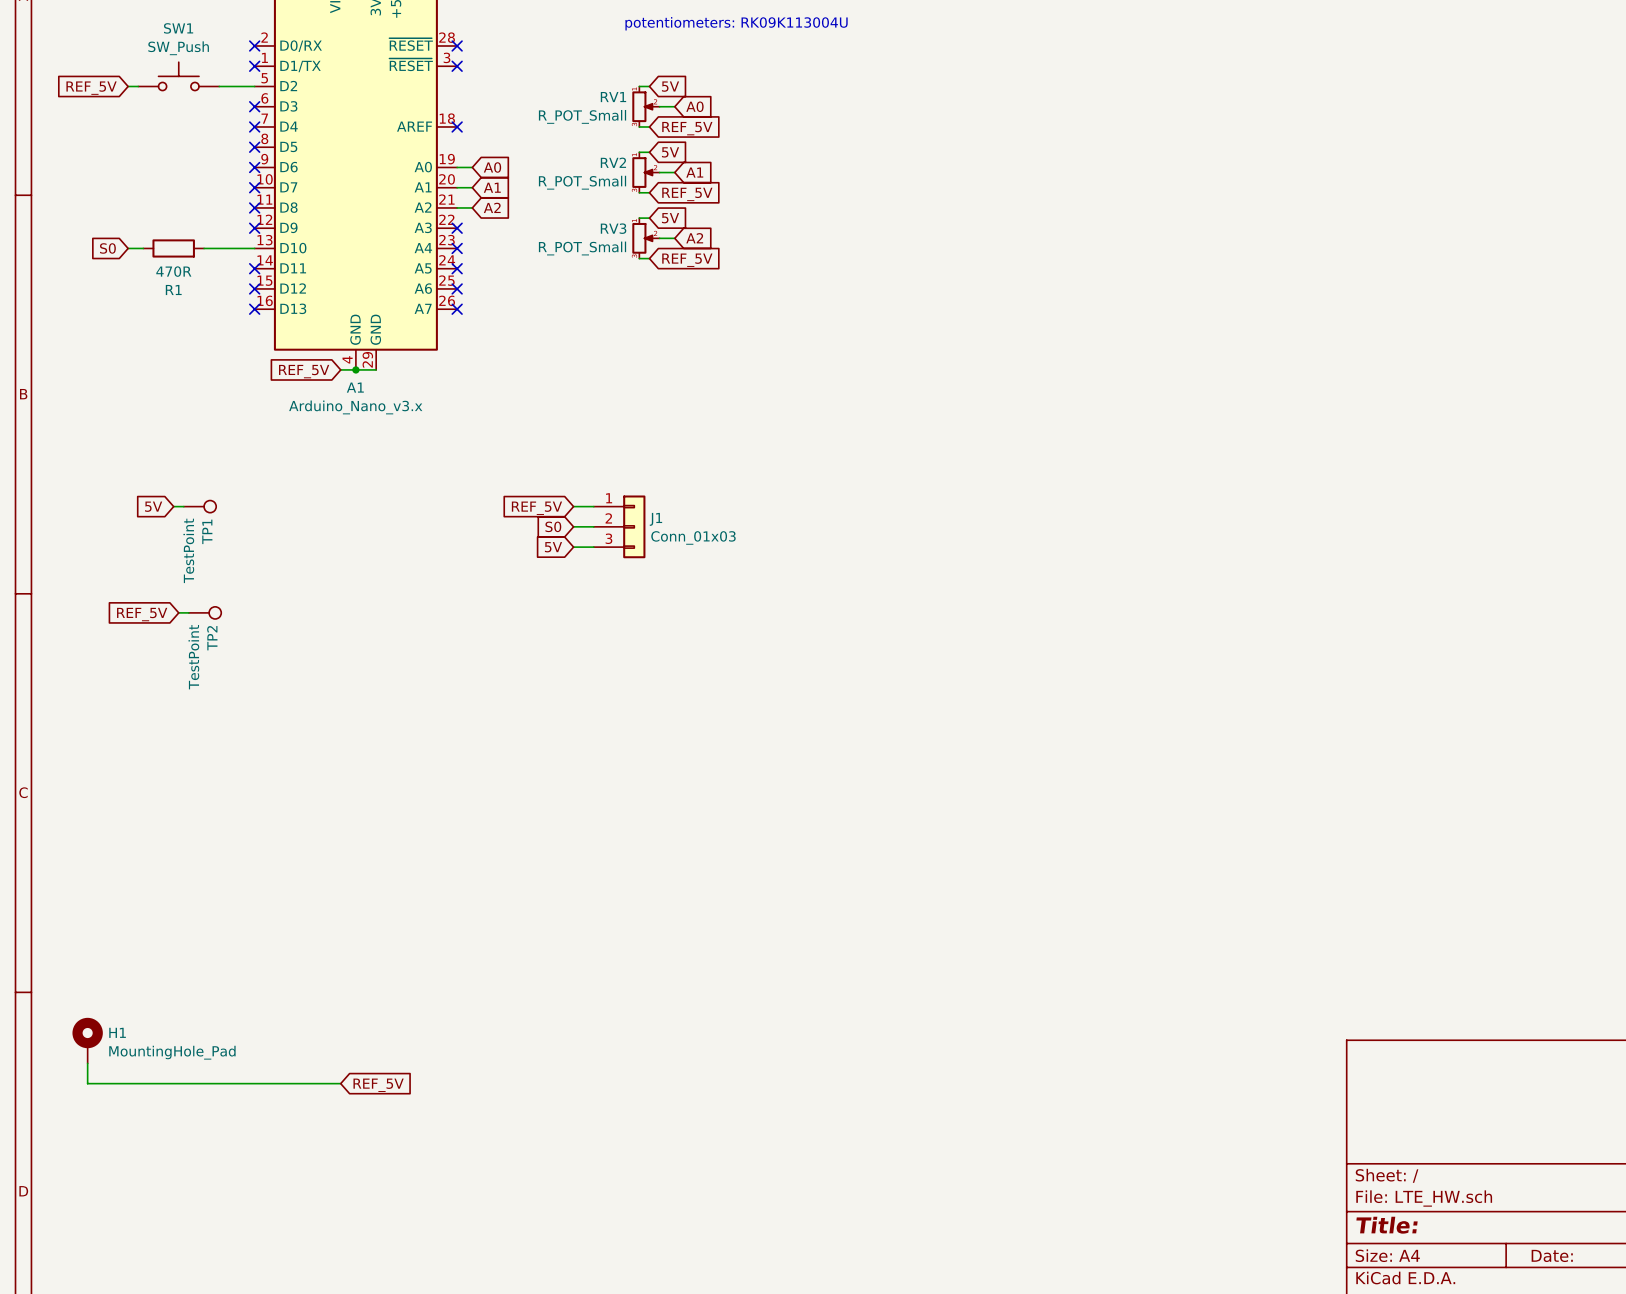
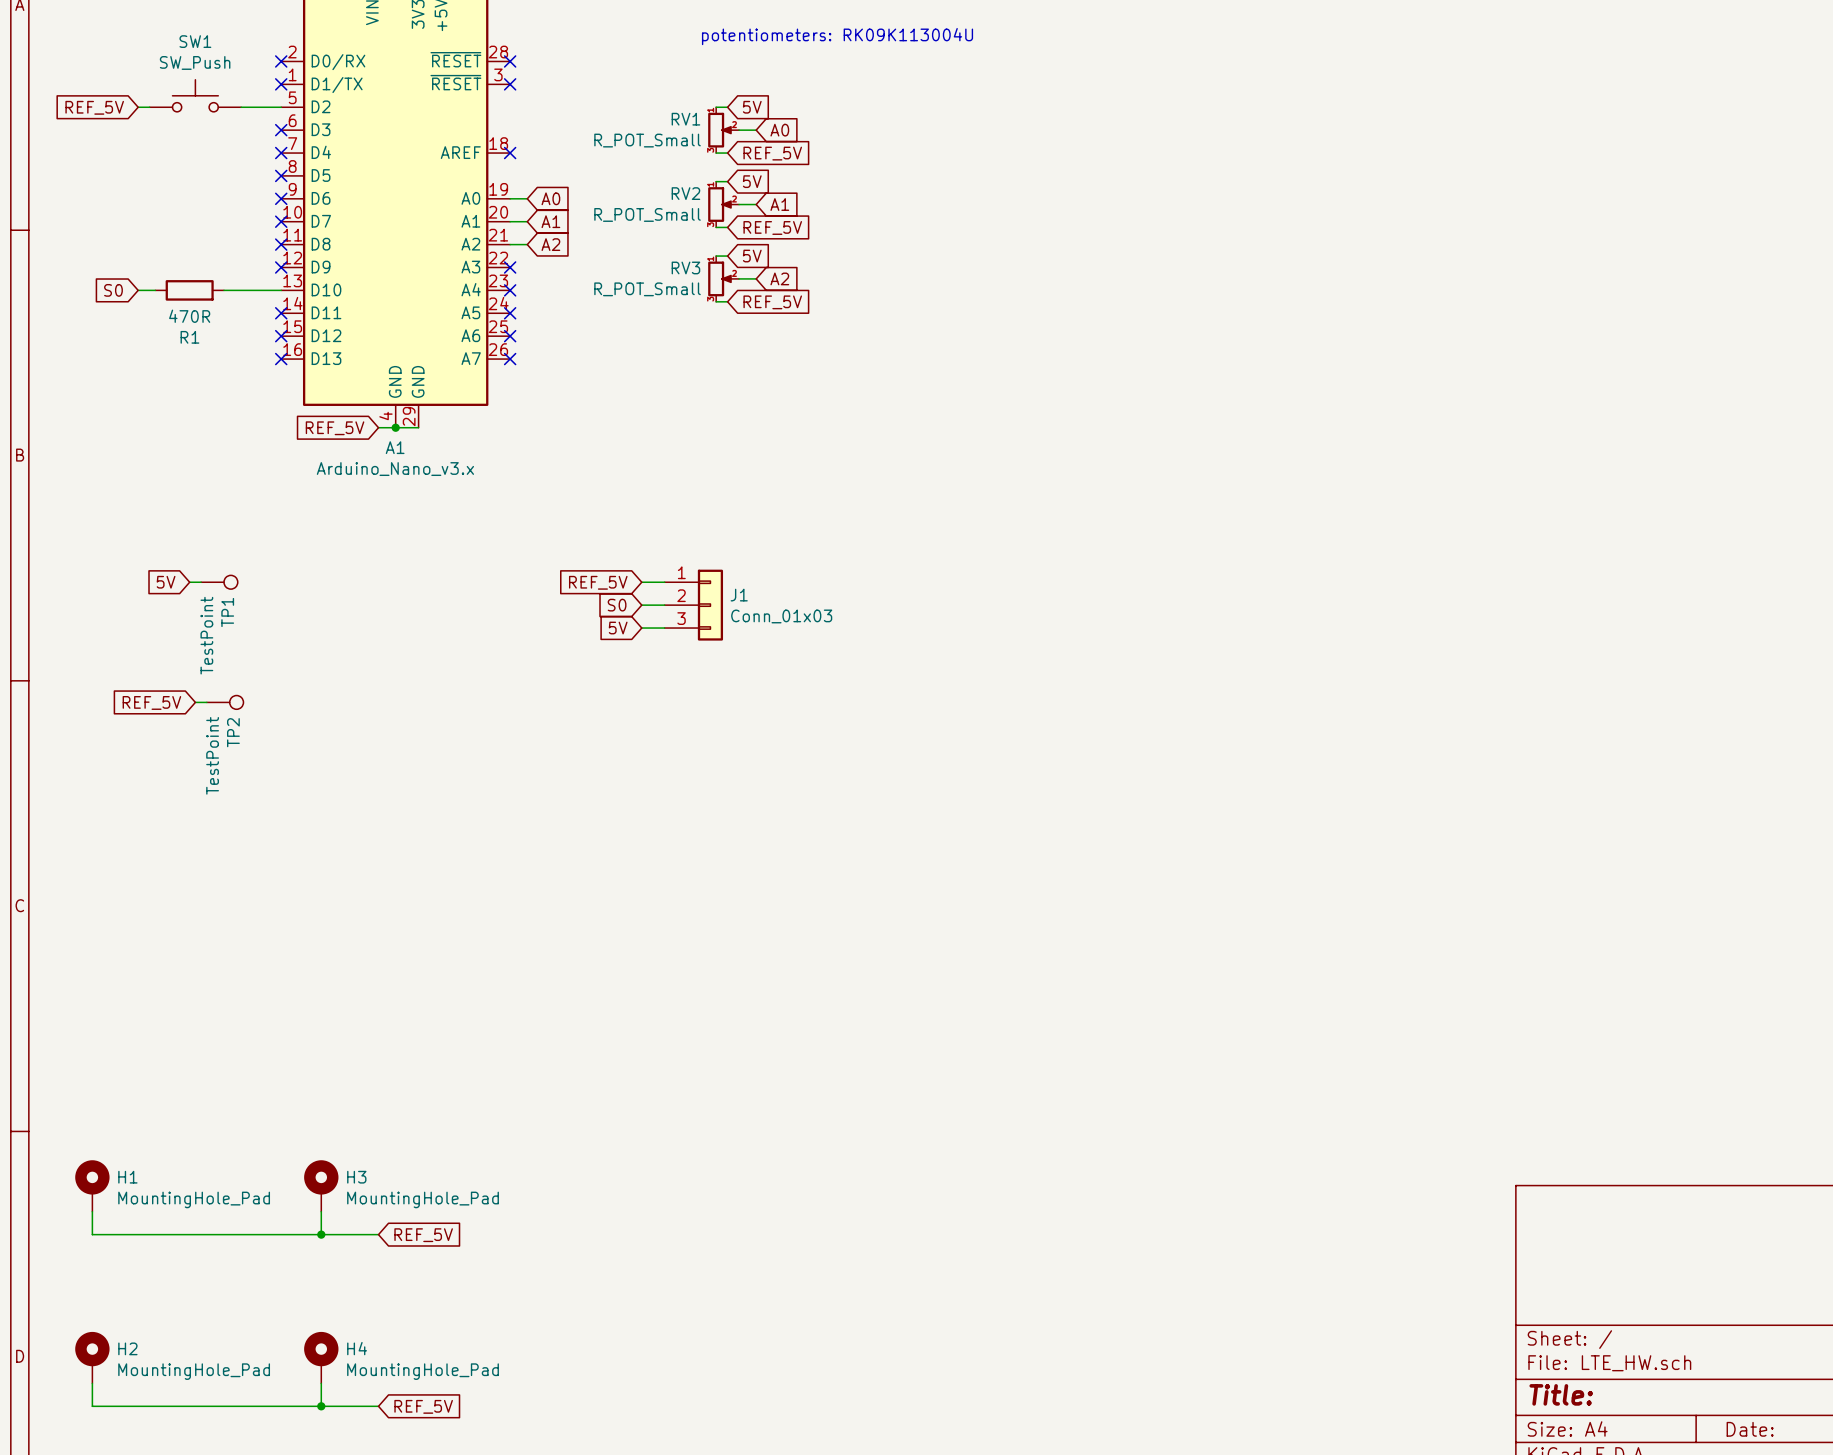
H3: none -> MountingHole_Pad (321, 1185)
wire: none -> (321, 1211) (321, 1234)
junction: none -> (321, 1234)
H2: none -> MountingHole_Pad (92, 1357)
H4: none -> MountingHole_Pad (321, 1357)
wire: none -> (92, 1383) (92, 1406) (378, 1406)
wire: none -> (321, 1383) (321, 1406)
junction: none -> (321, 1406)
global label: none -> REF_5V (423, 1406)

